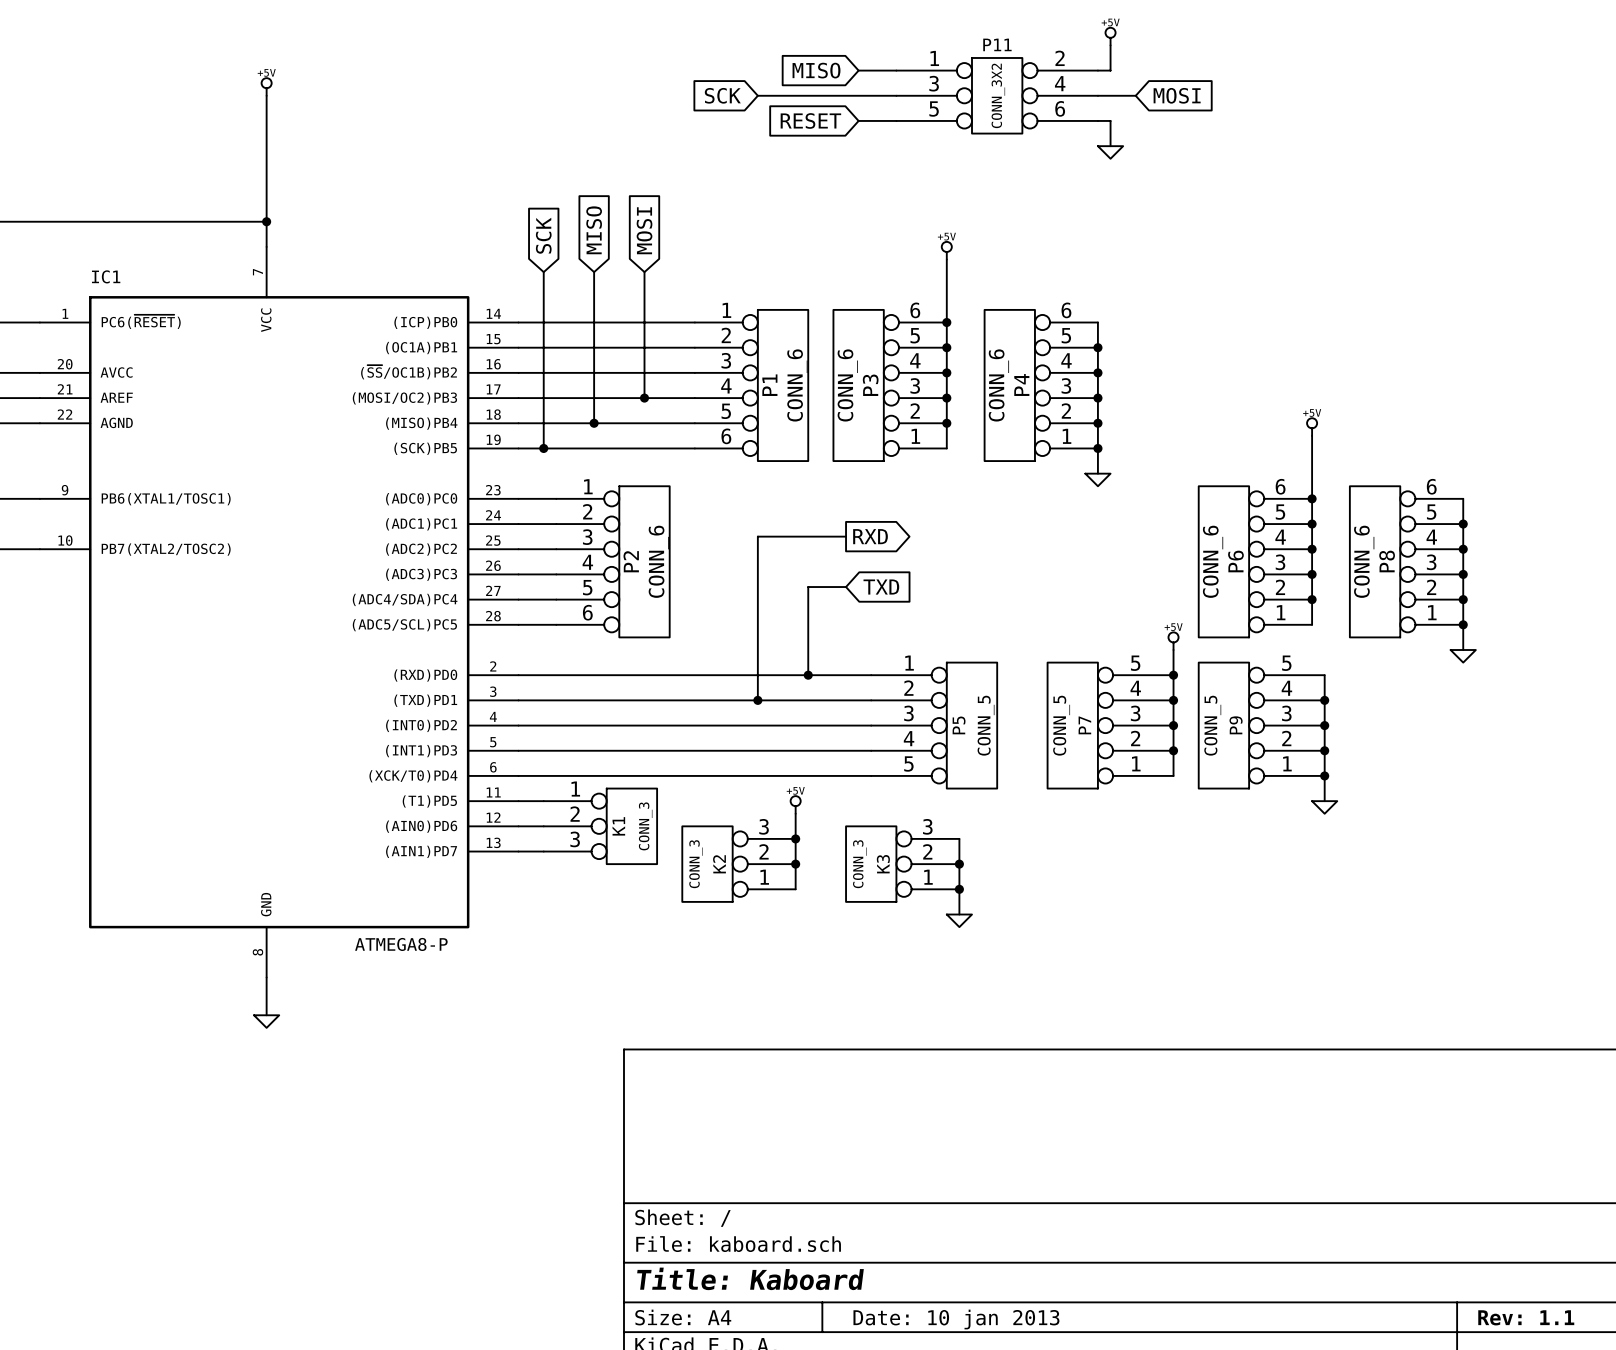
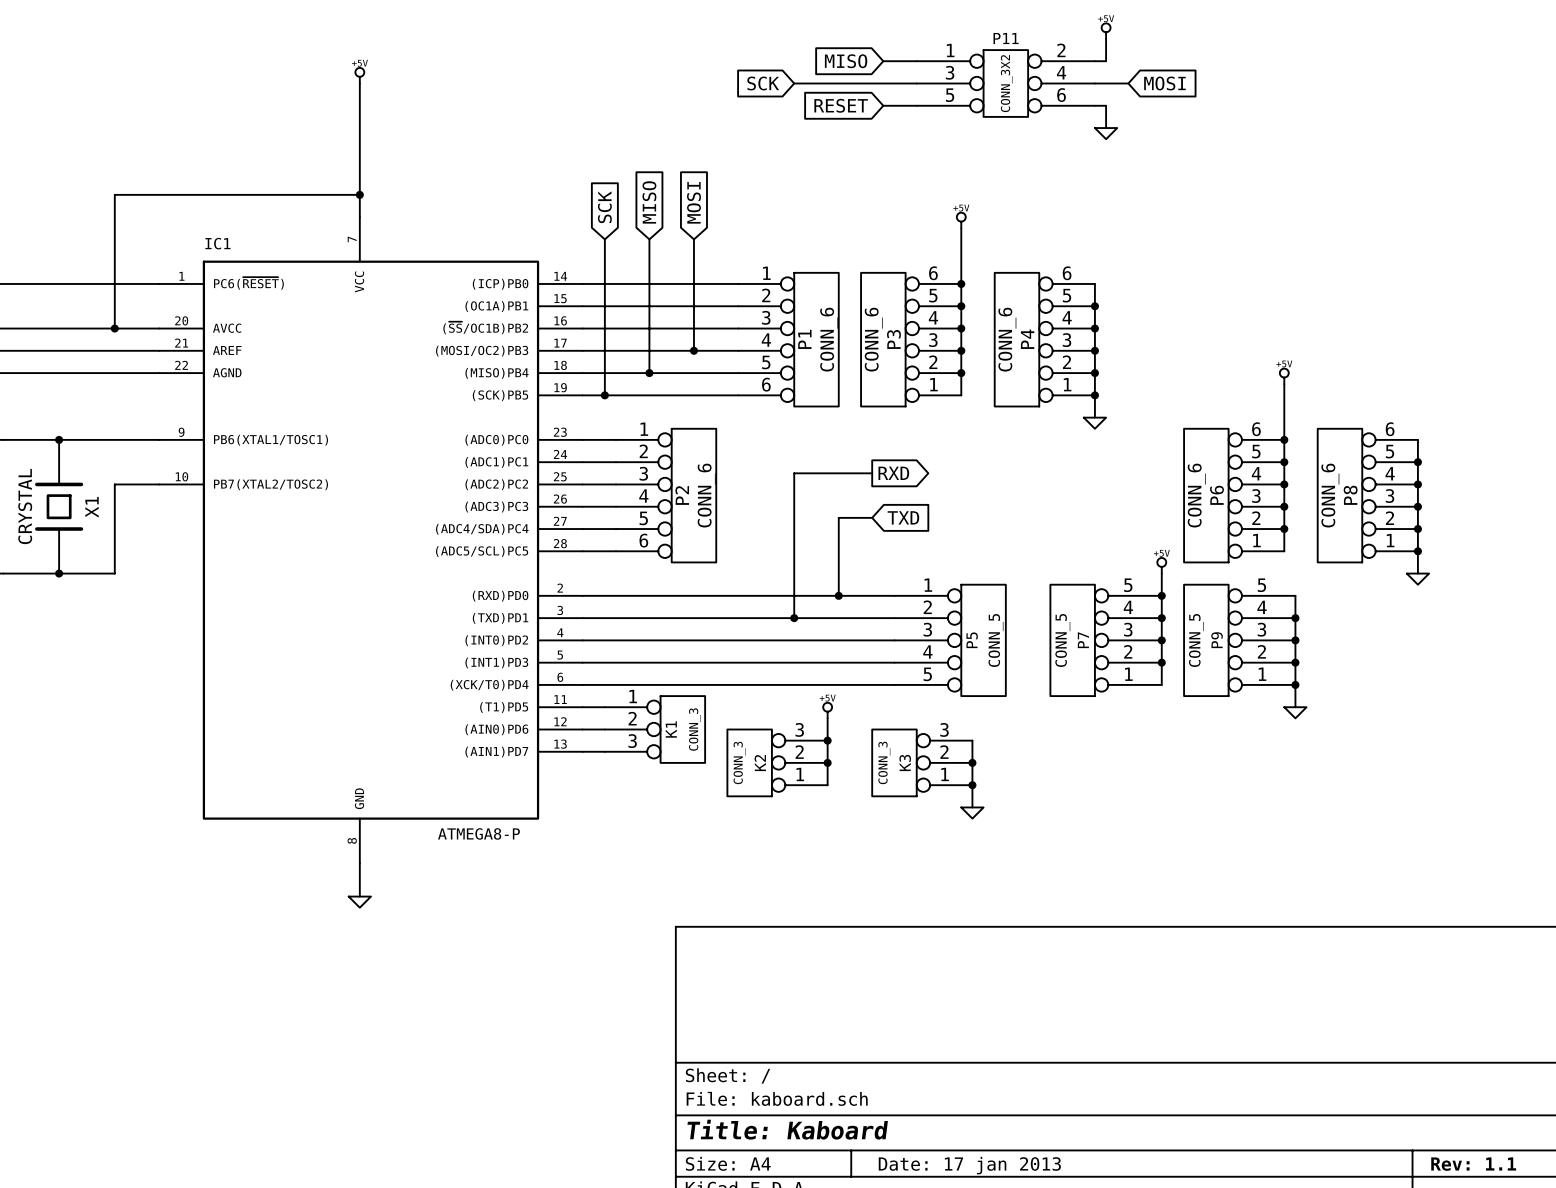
title block: Date: 10 jan 2013 (956, 1319) -> Date: 17 jan 2013 (969, 1165)

